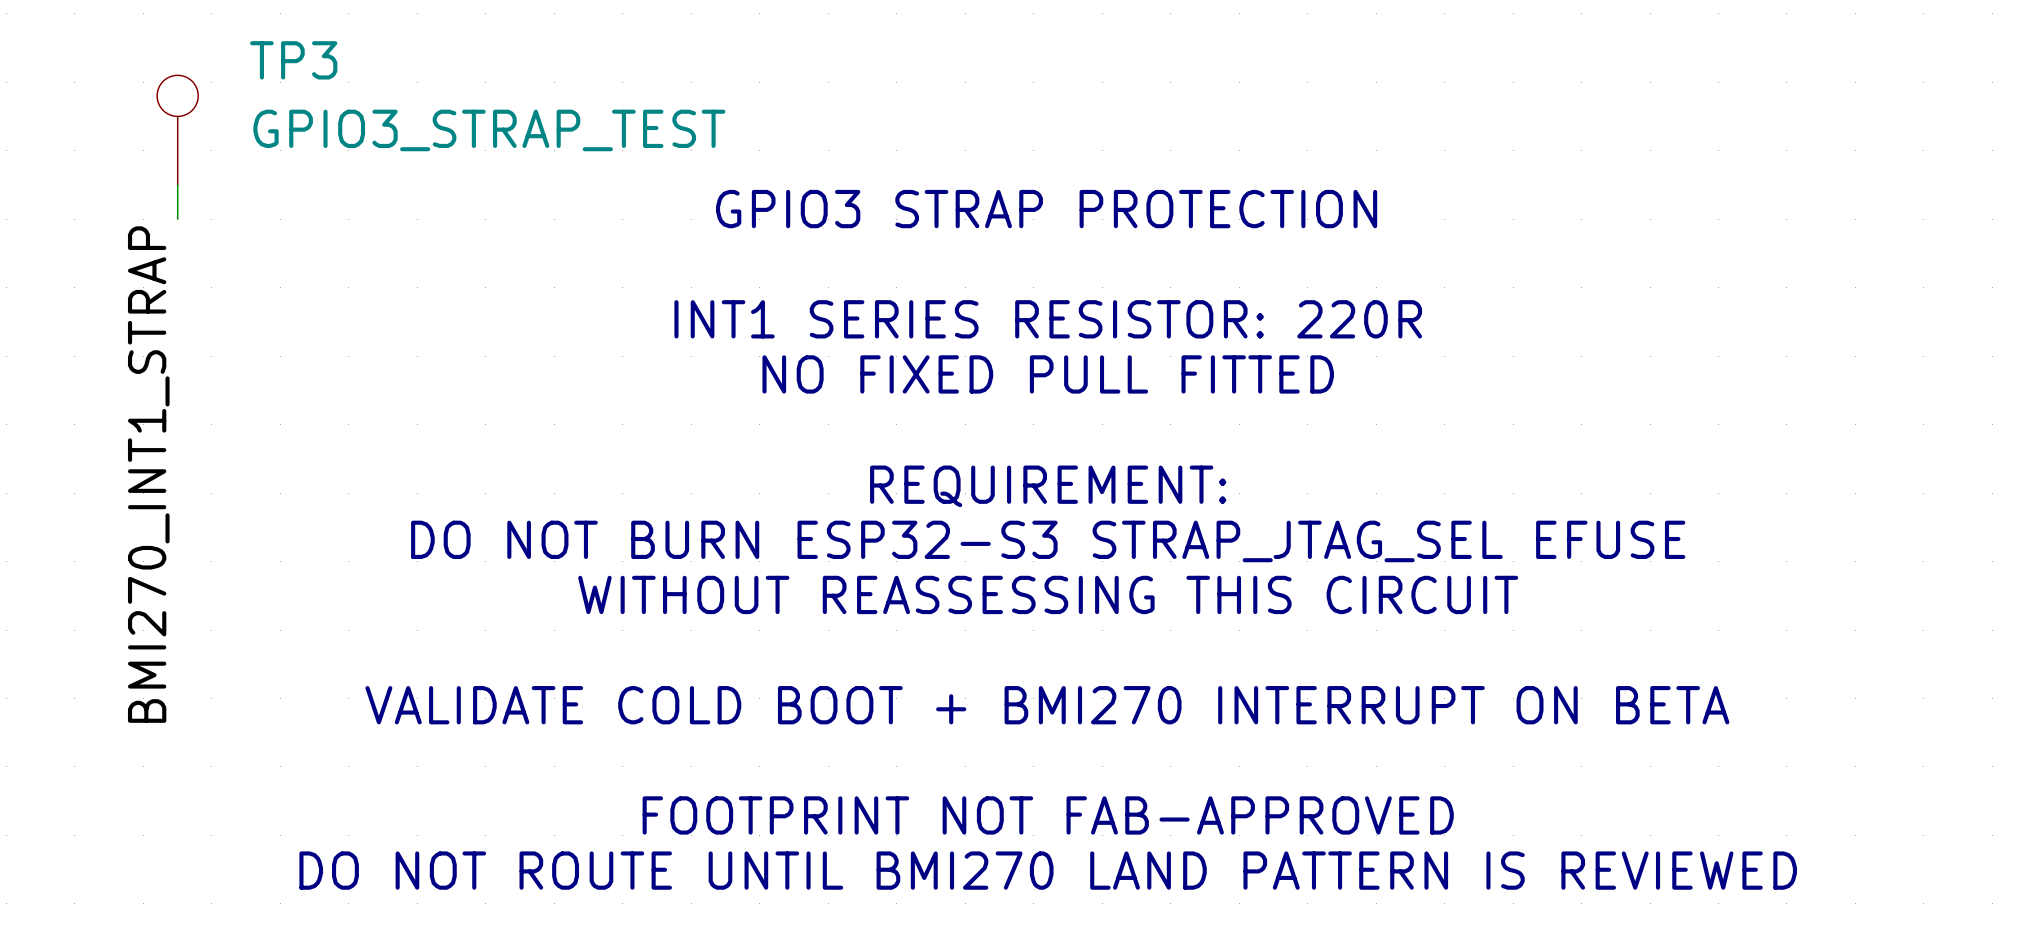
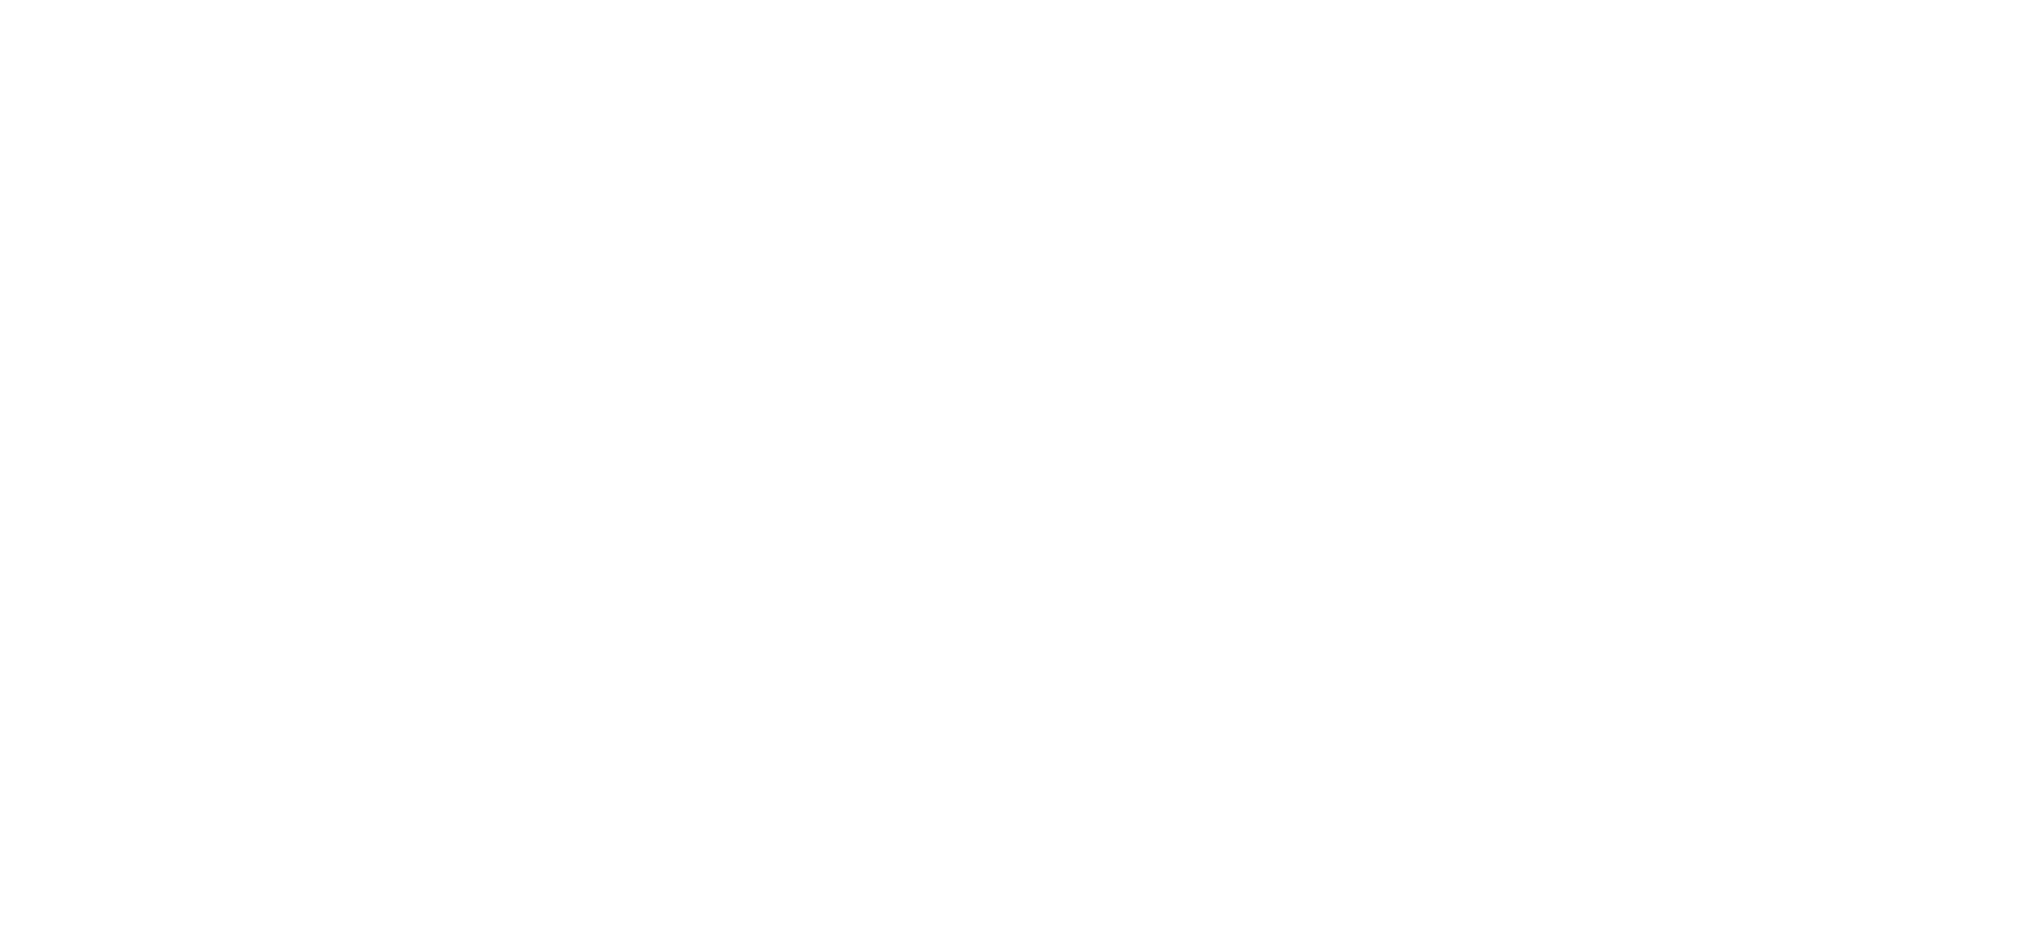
TP3: GPIO3_STRAP_TEST (177, 130) -> none
wire: (177, 184) (177, 219) -> none
text: GPIO3 STRAP PROTECTION (1046, 209) -> none
text: INT1 SERIES RESISTOR: 220R (1048, 319) -> none
text: NO FIXED PULL FITTED (1048, 374) -> none
label: BMI270_INT1_STRAP (148, 474) -> none
text: REQUIREMENT: (1048, 486) -> none
text: DO NOT BURN ESP32-S3 STRAP_JTAG_SEL EFUSE (1048, 541) -> none
text: WITHOUT REASSESSING THIS CIRCUIT (1048, 594) -> none
text: VALIDATE COLD BOOT + BMI270 INTERRUPT ON BETA (1047, 705) -> none
text: FOOTPRINT NOT FAB-APPROVED (1048, 815) -> none
text: DO NOT ROUTE UNTIL BMI270 LAND PATTERN IS REVIEWED (1048, 870) -> none

